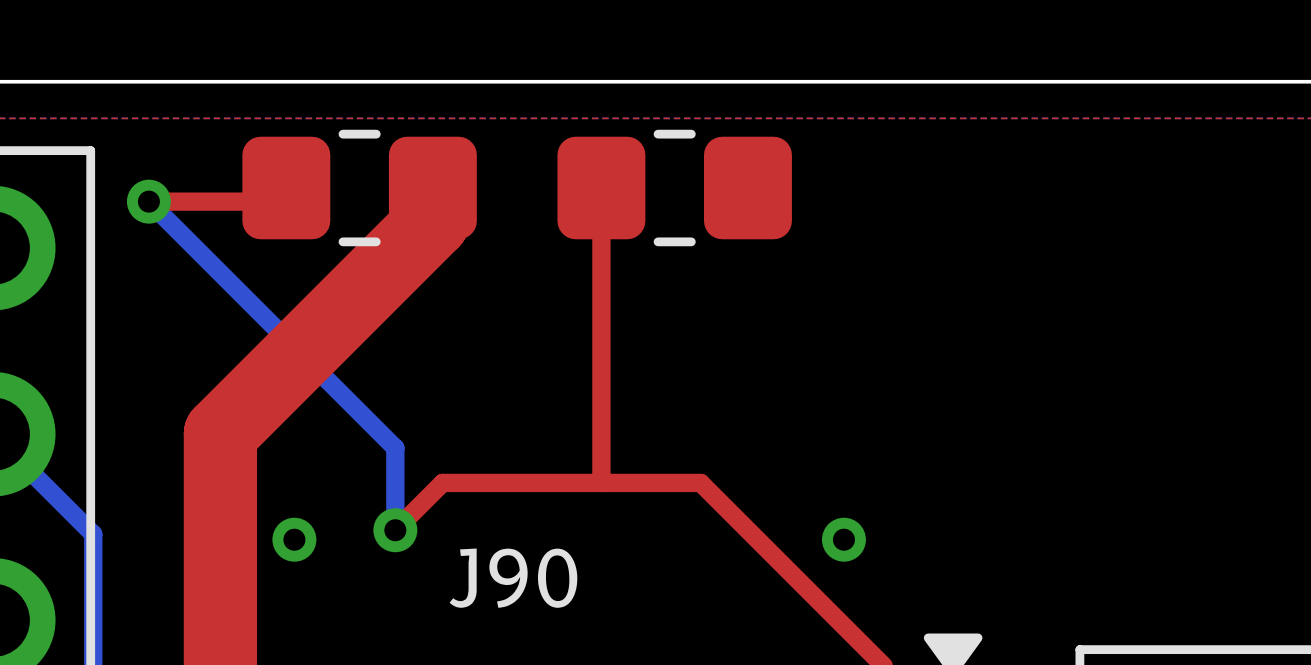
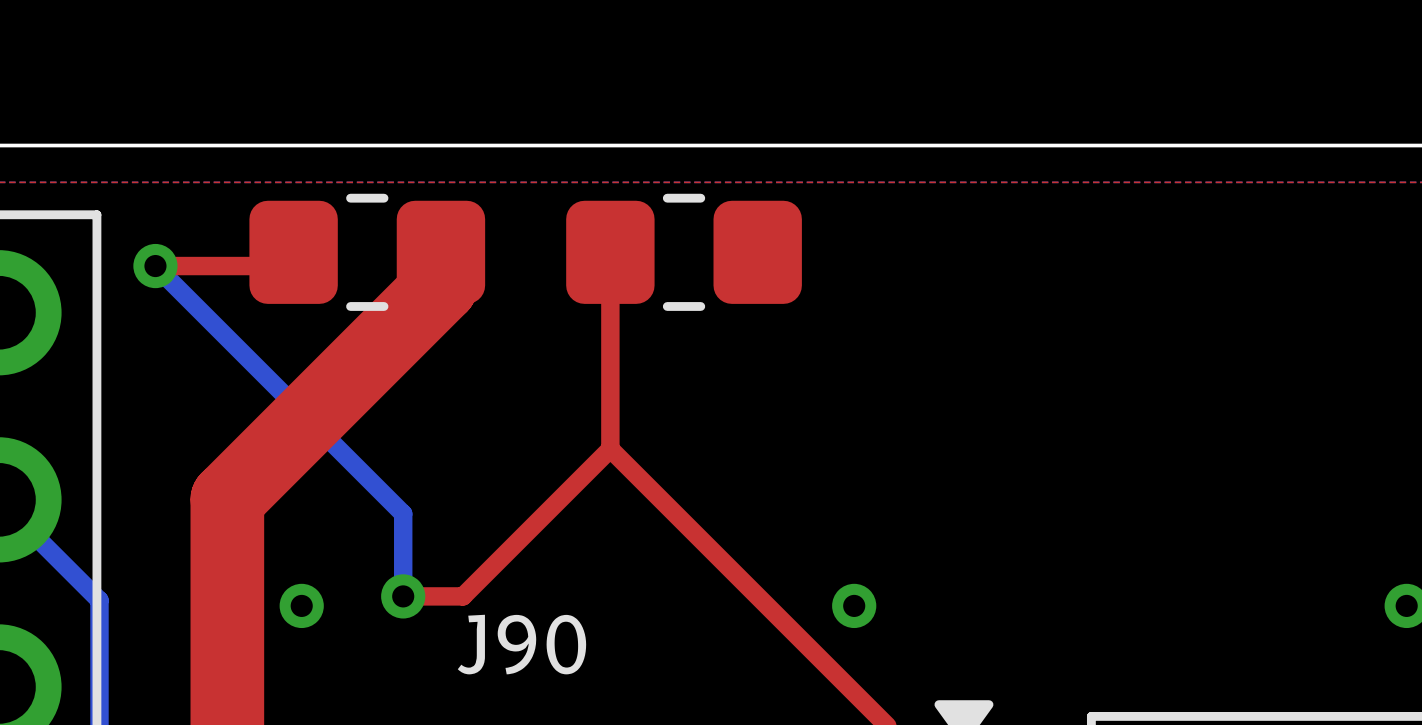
top track: (601, 383) (601, 482) -> none
top track: (700, 482) (442, 482) (395, 530) -> (710, 548) (610, 449) (462, 596) (403, 596)

